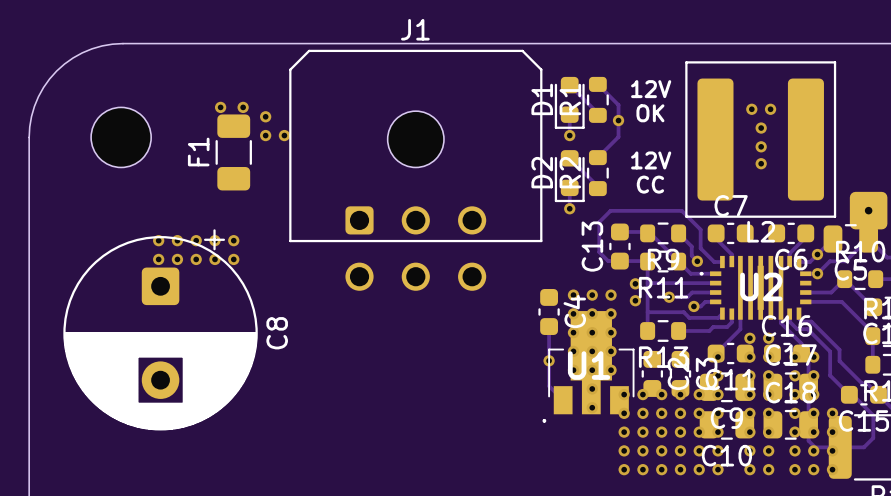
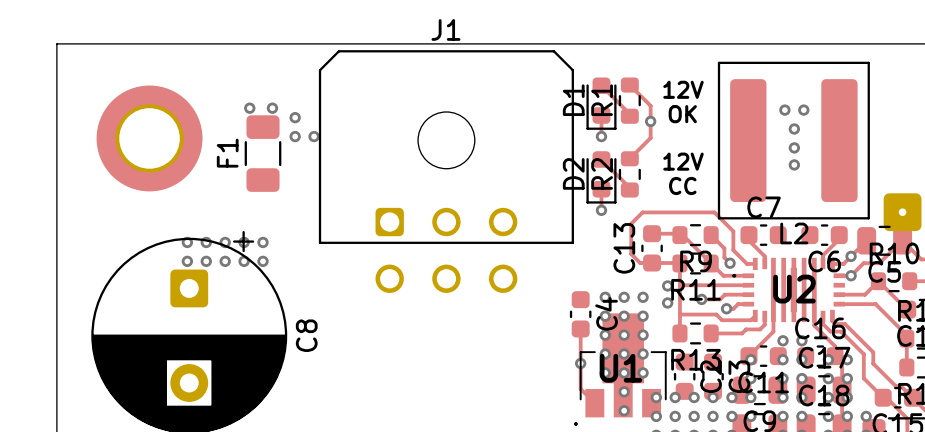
board edge: (123, 43) (102, 45) (82, 52) (56, 71) (38, 96) (31, 116) (29, 137) -> (151, 43) (56, 43) (56, 138)
part footprint: [91, 107, 152, 168] -> [96, 85, 203, 192]

